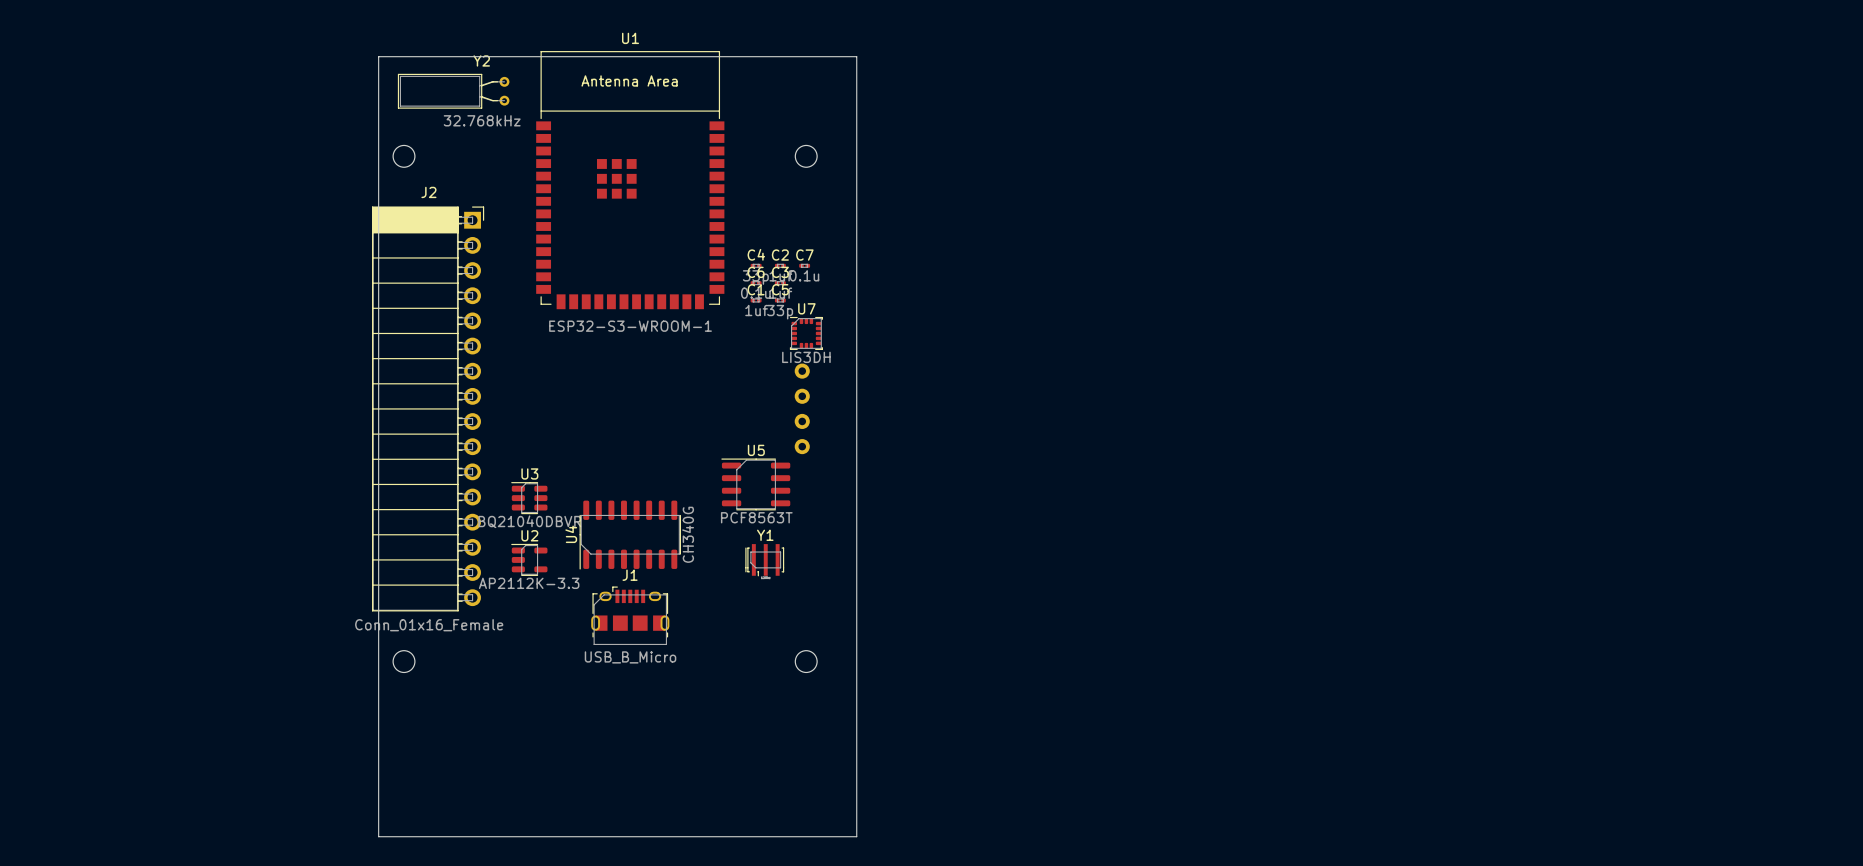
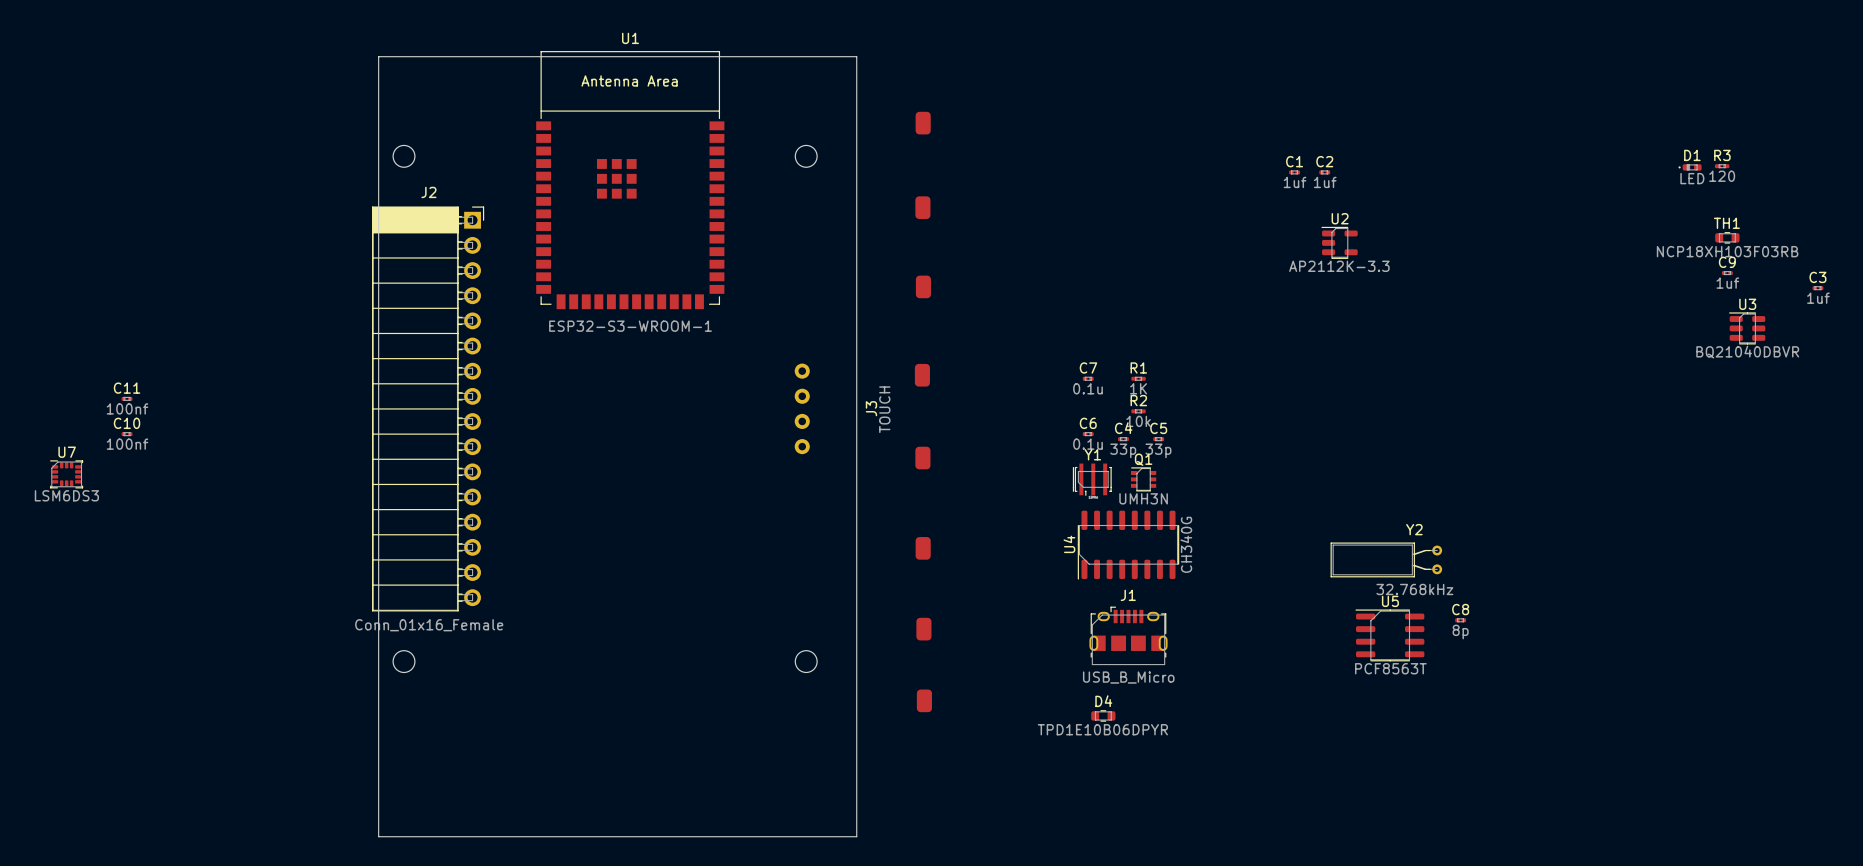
Y2 position: (453, 91) -> (1386, 559)
R3: none -> 120 (1722, 166)
D1: none -> LED (1690, 167)
TH1: none -> NCP18XH103F03RB (1727, 237)
C4 position: (756, 265) -> (1123, 439)
C2 position: (780, 265) -> (1324, 172)
C7 position: (804, 265) -> (1088, 378)
C9: none -> 1uf (1727, 273)
C6 position: (756, 283) -> (1088, 434)
C3 position: (780, 283) -> (1817, 288)
C1 position: (756, 300) -> (1294, 172)
C5 position: (780, 300) -> (1158, 439)
U7 footprint: [789, 316, 823, 351] -> [50, 460, 84, 489]
U7 value: LIS3DH (806, 357) -> LSM6DS3 (66, 495)
R1: none -> 1K (1138, 378)
C11: none -> 100nf (127, 398)
J3: none -> TOUCH (923, 411)
R2: none -> 10k (1138, 411)
C10: none -> 100nf (127, 434)
Q1: none -> UMH3N (1143, 479)
U5 position: (755, 484) -> (1389, 635)
U3 position: (529, 498) -> (1747, 328)
U4 position: (630, 535) -> (1128, 545)
U2 position: (529, 559) -> (1339, 242)
Y1 position: (764, 560) -> (1092, 479)
J1 position: (630, 615) -> (1128, 635)
C8: none -> 8p (1460, 620)
D4: none -> TPD1E10B06DPYR (1103, 715)

